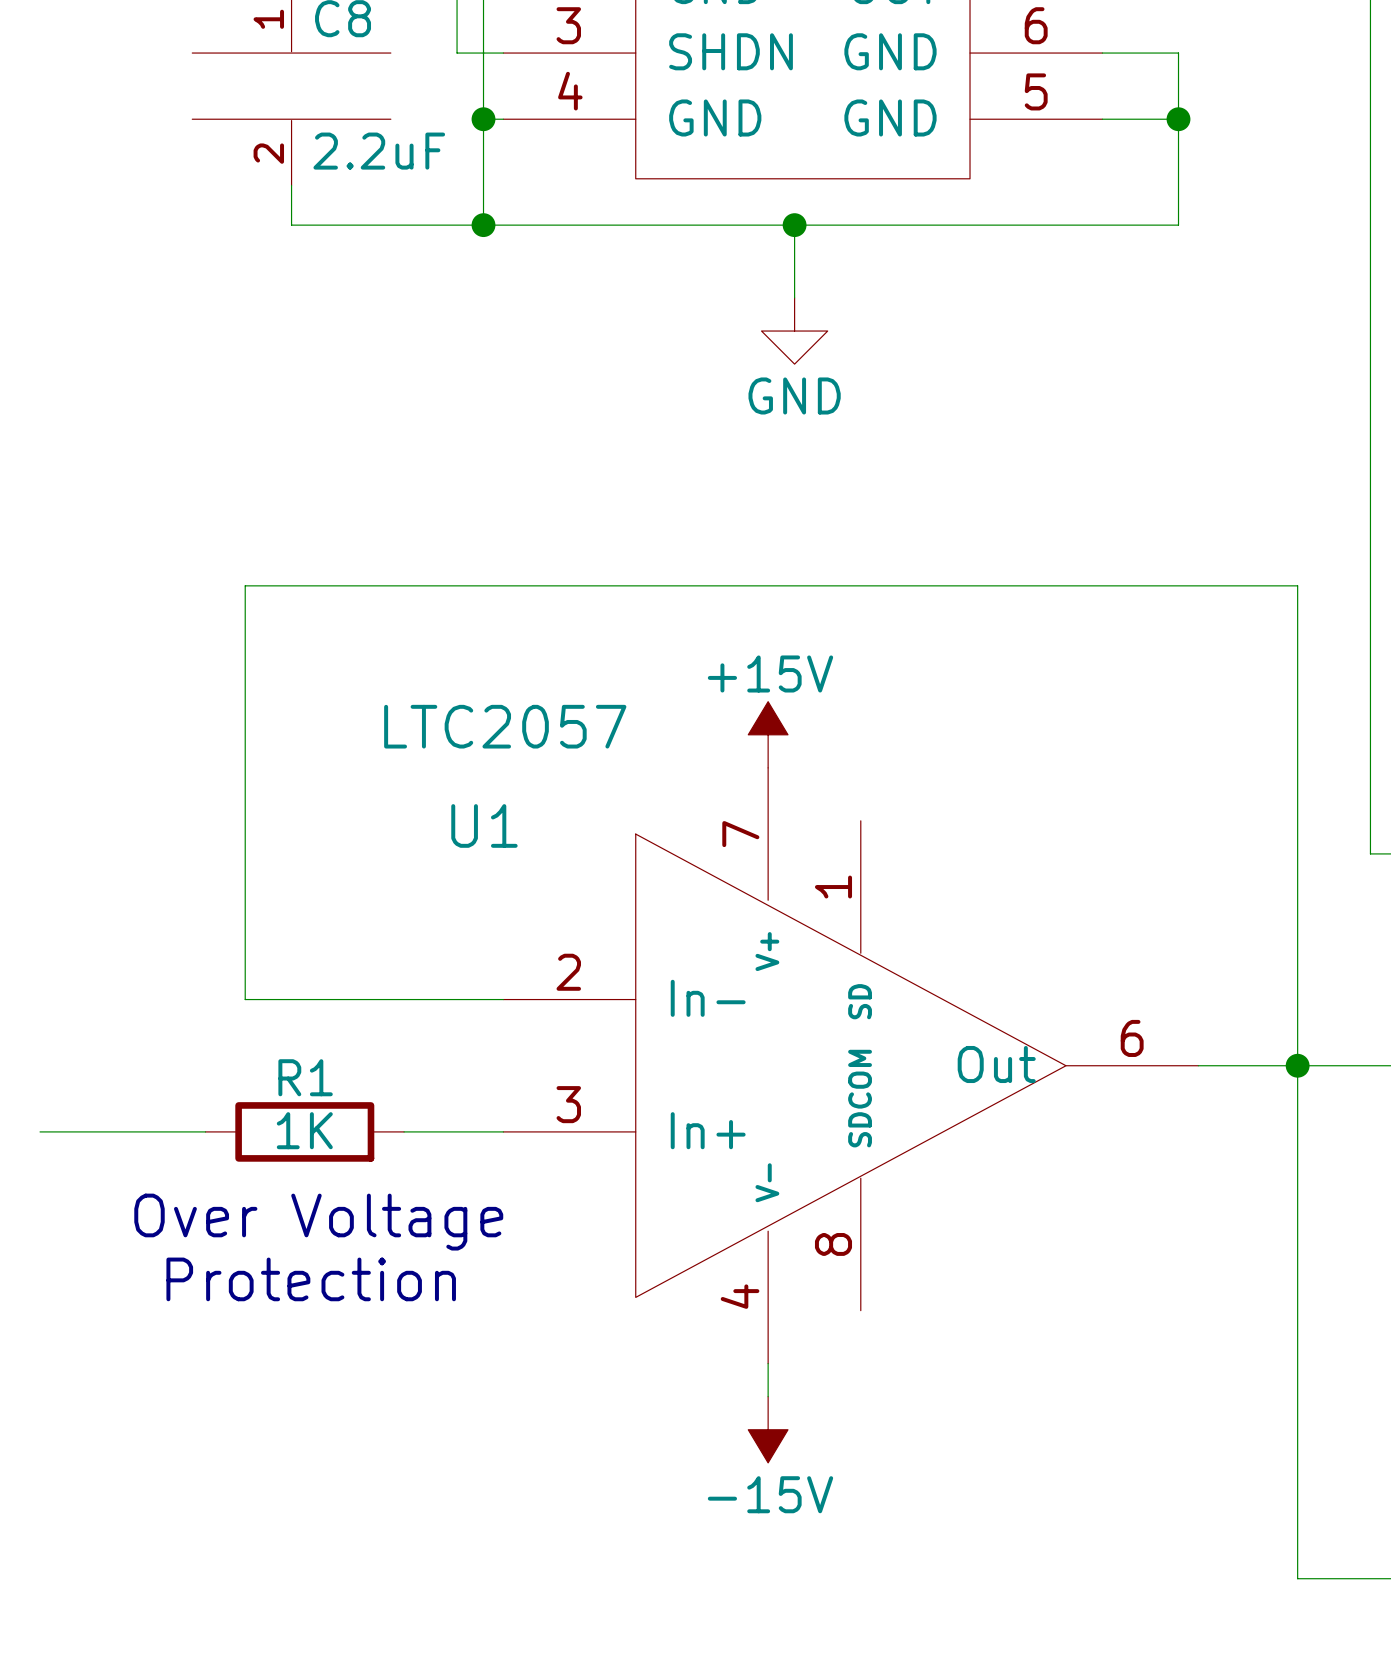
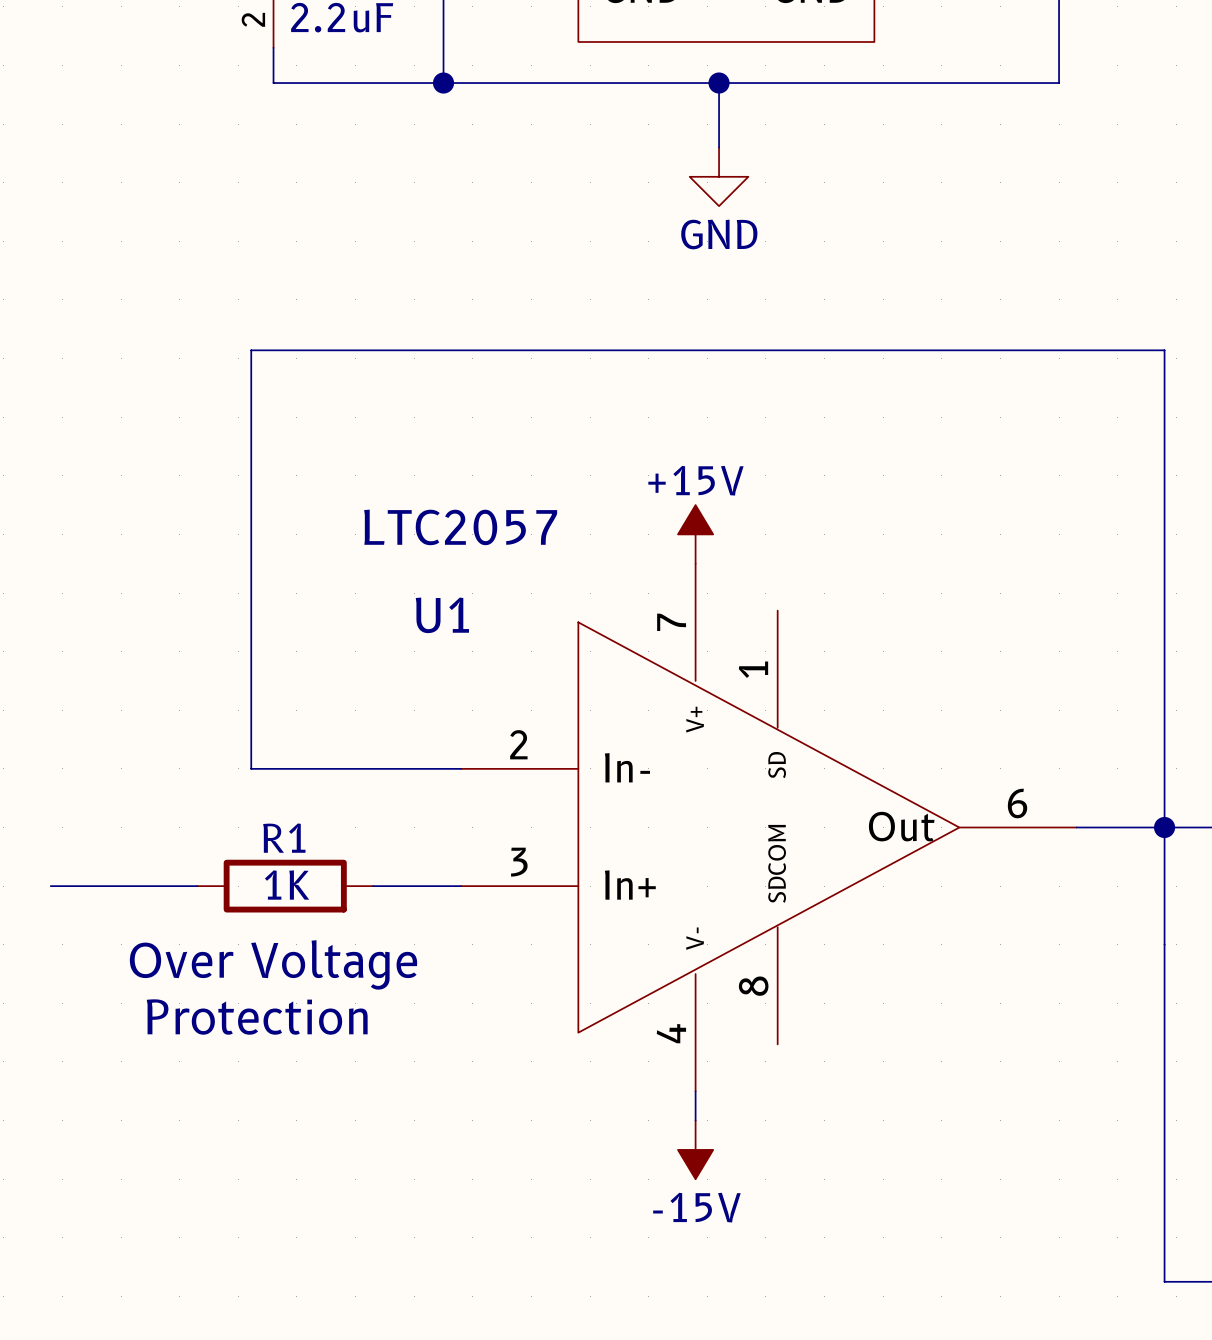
wire: (1297, 585) (245, 585) (245, 999) (266, 999) -> (1164, 402) (1164, 350) (251, 350) (251, 768)

